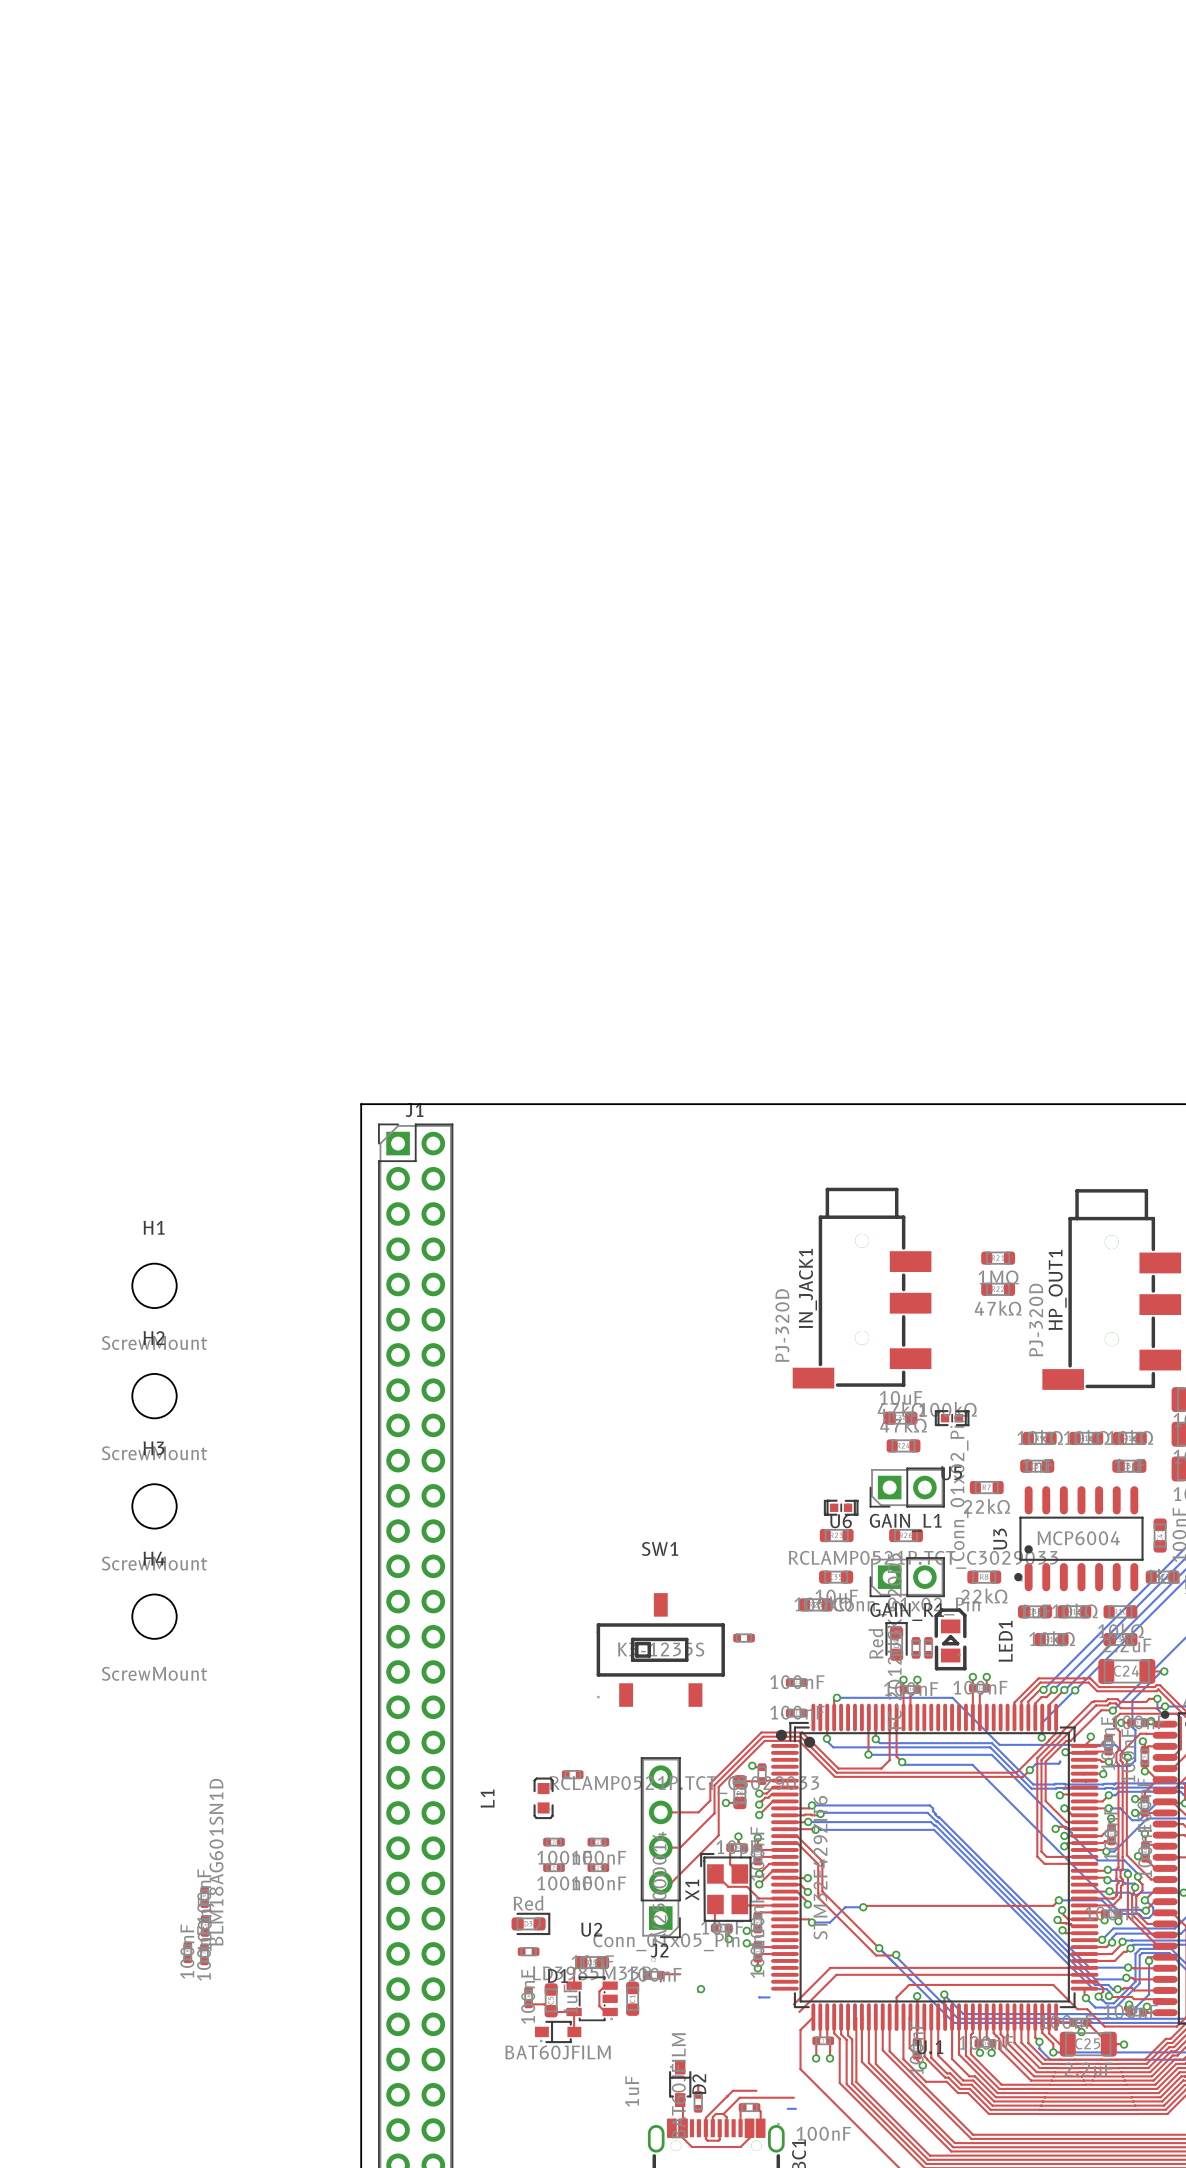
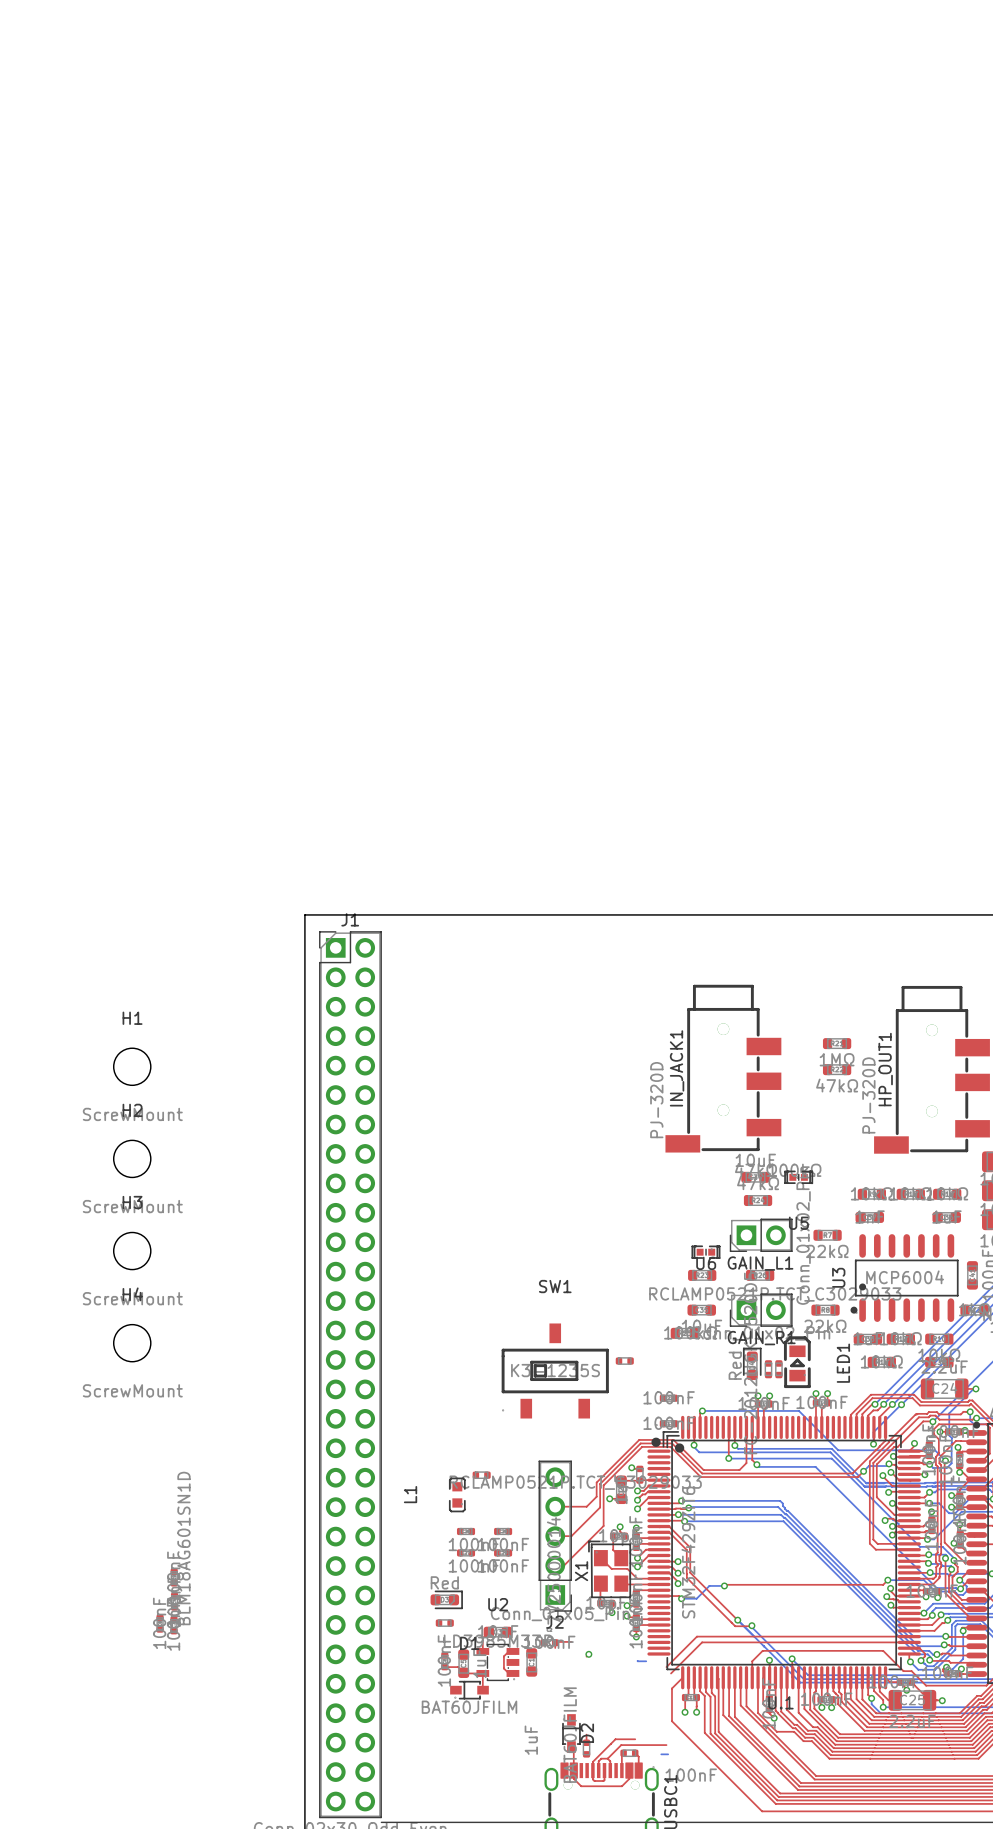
top track: none -> (889, 1463) (895, 1464) (899, 1468)
via: none -> (889, 1463)
top track: none -> (890, 1472) (899, 1480)
via: none -> (890, 1472)
top track: none -> (882, 1475) (892, 1485)
via: none -> (882, 1475)

